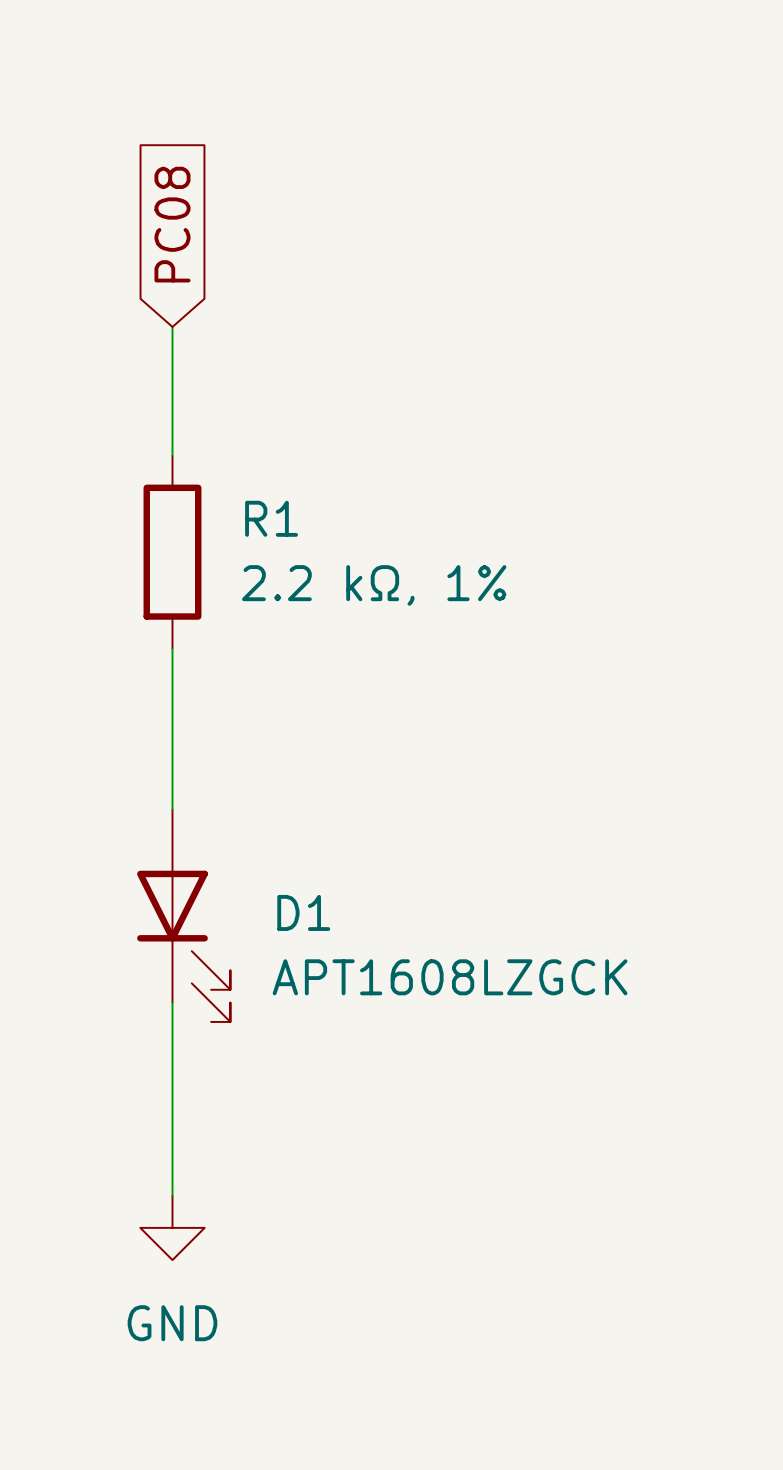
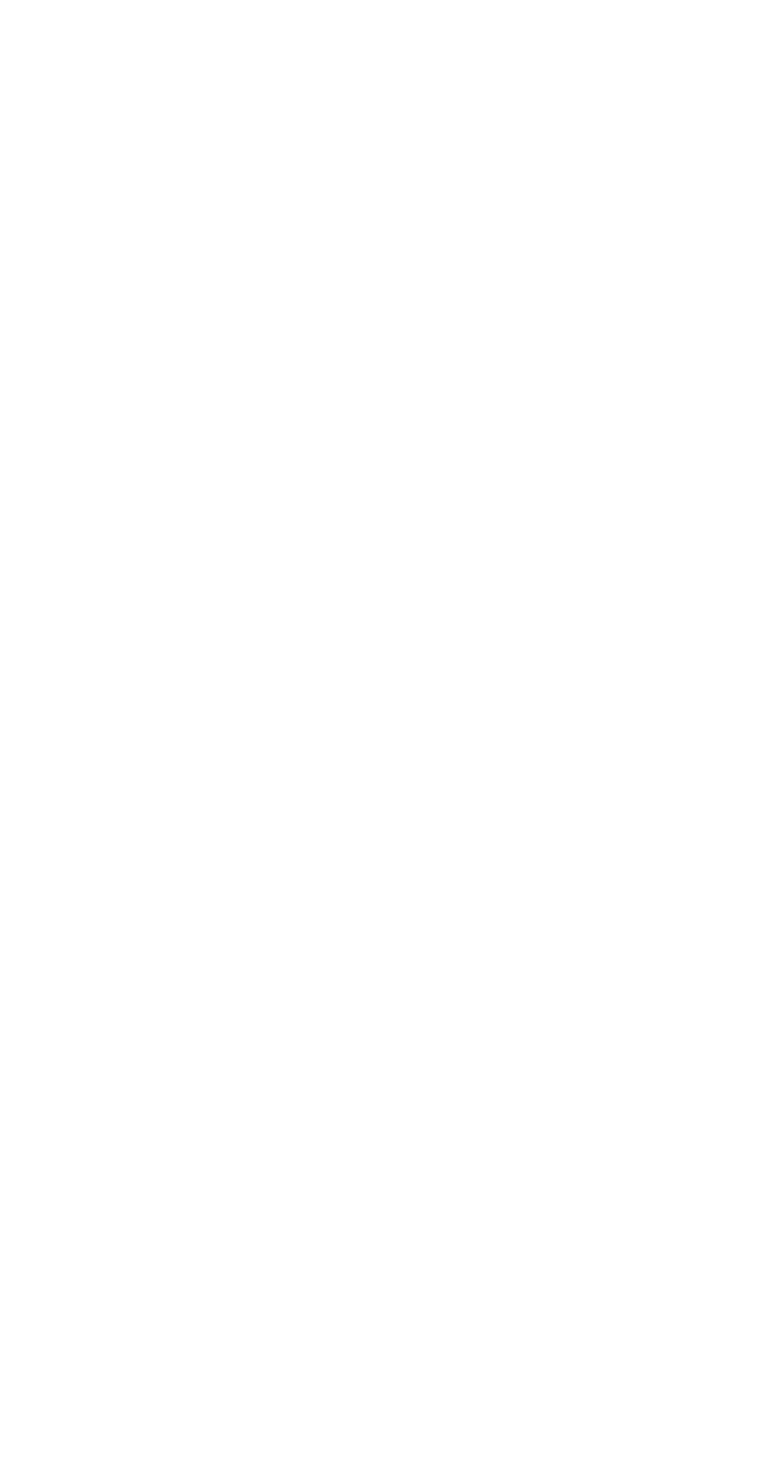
global label: PC08 (172, 224) -> none
wire: (172, 326) (172, 455) -> none
R1: 2.2 kΩ, 1% (172, 552) -> none
wire: (172, 648) (172, 809) -> none
D1: APT1608LZGCK (183, 915) -> none
wire: (172, 1002) (172, 1195) -> none
power symbol: GND (172, 1227) -> none

